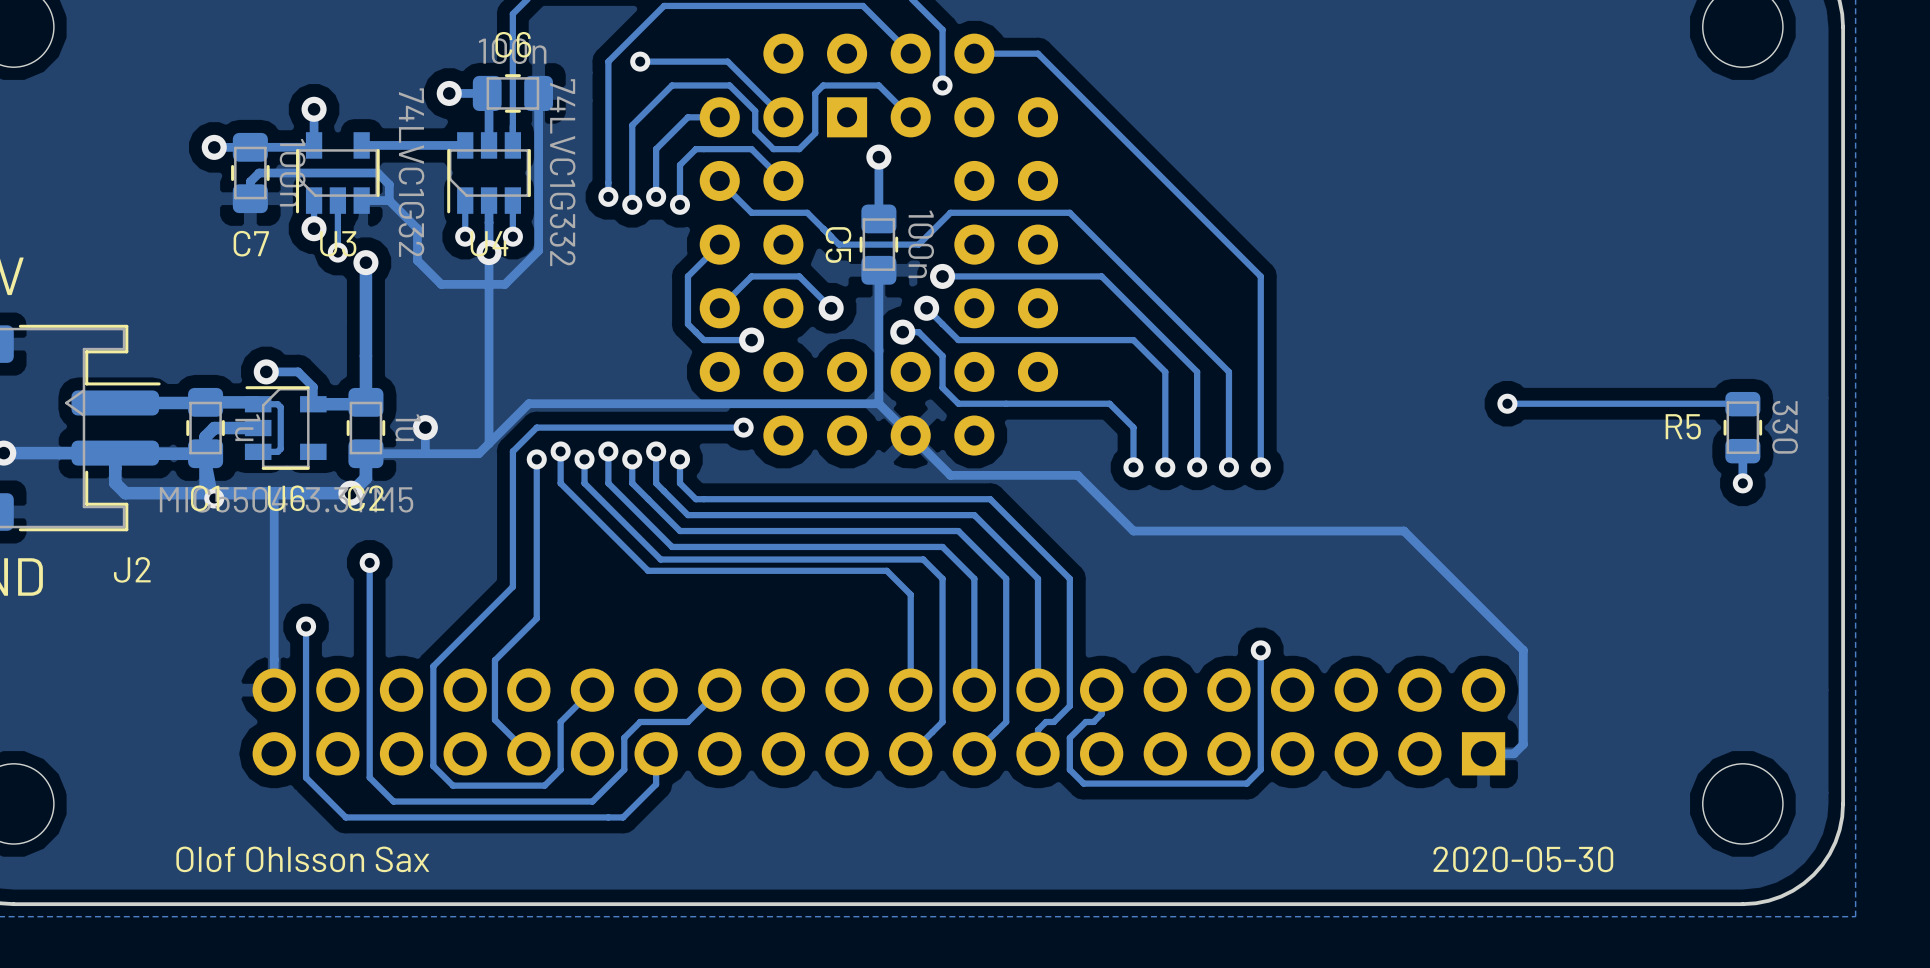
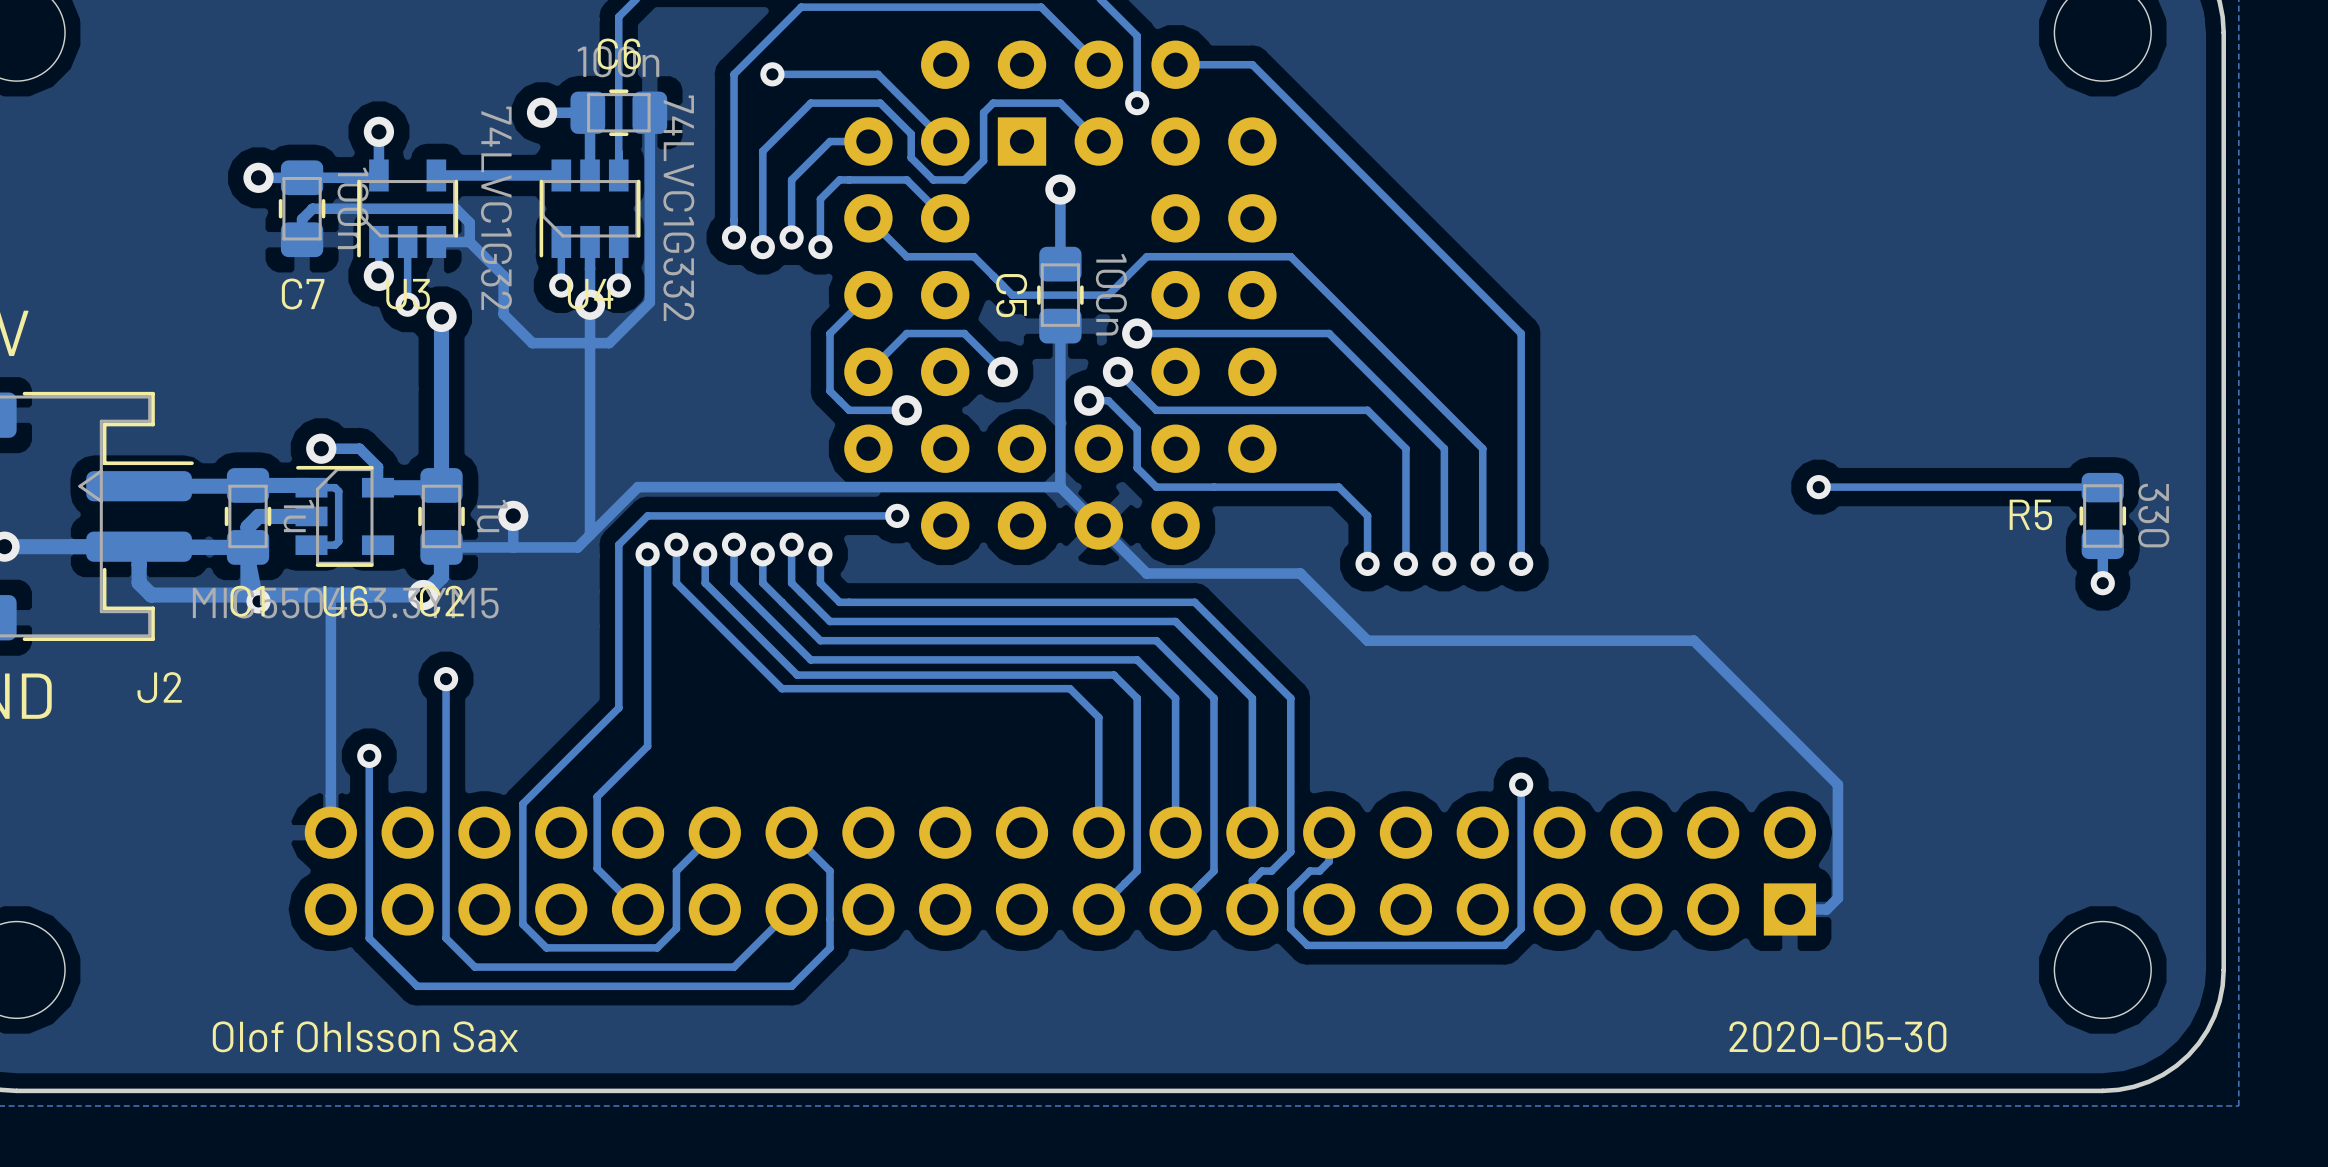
track: none -> (791, 832) (830, 871) (830, 947) (791, 986) (751, 986)
track: (719, 690) (687, 721) (640, 721) (624, 737) (624, 769) (592, 801) -> none
track: (656, 753) (656, 784) (623, 817) -> (791, 909) (734, 967) (714, 967)

